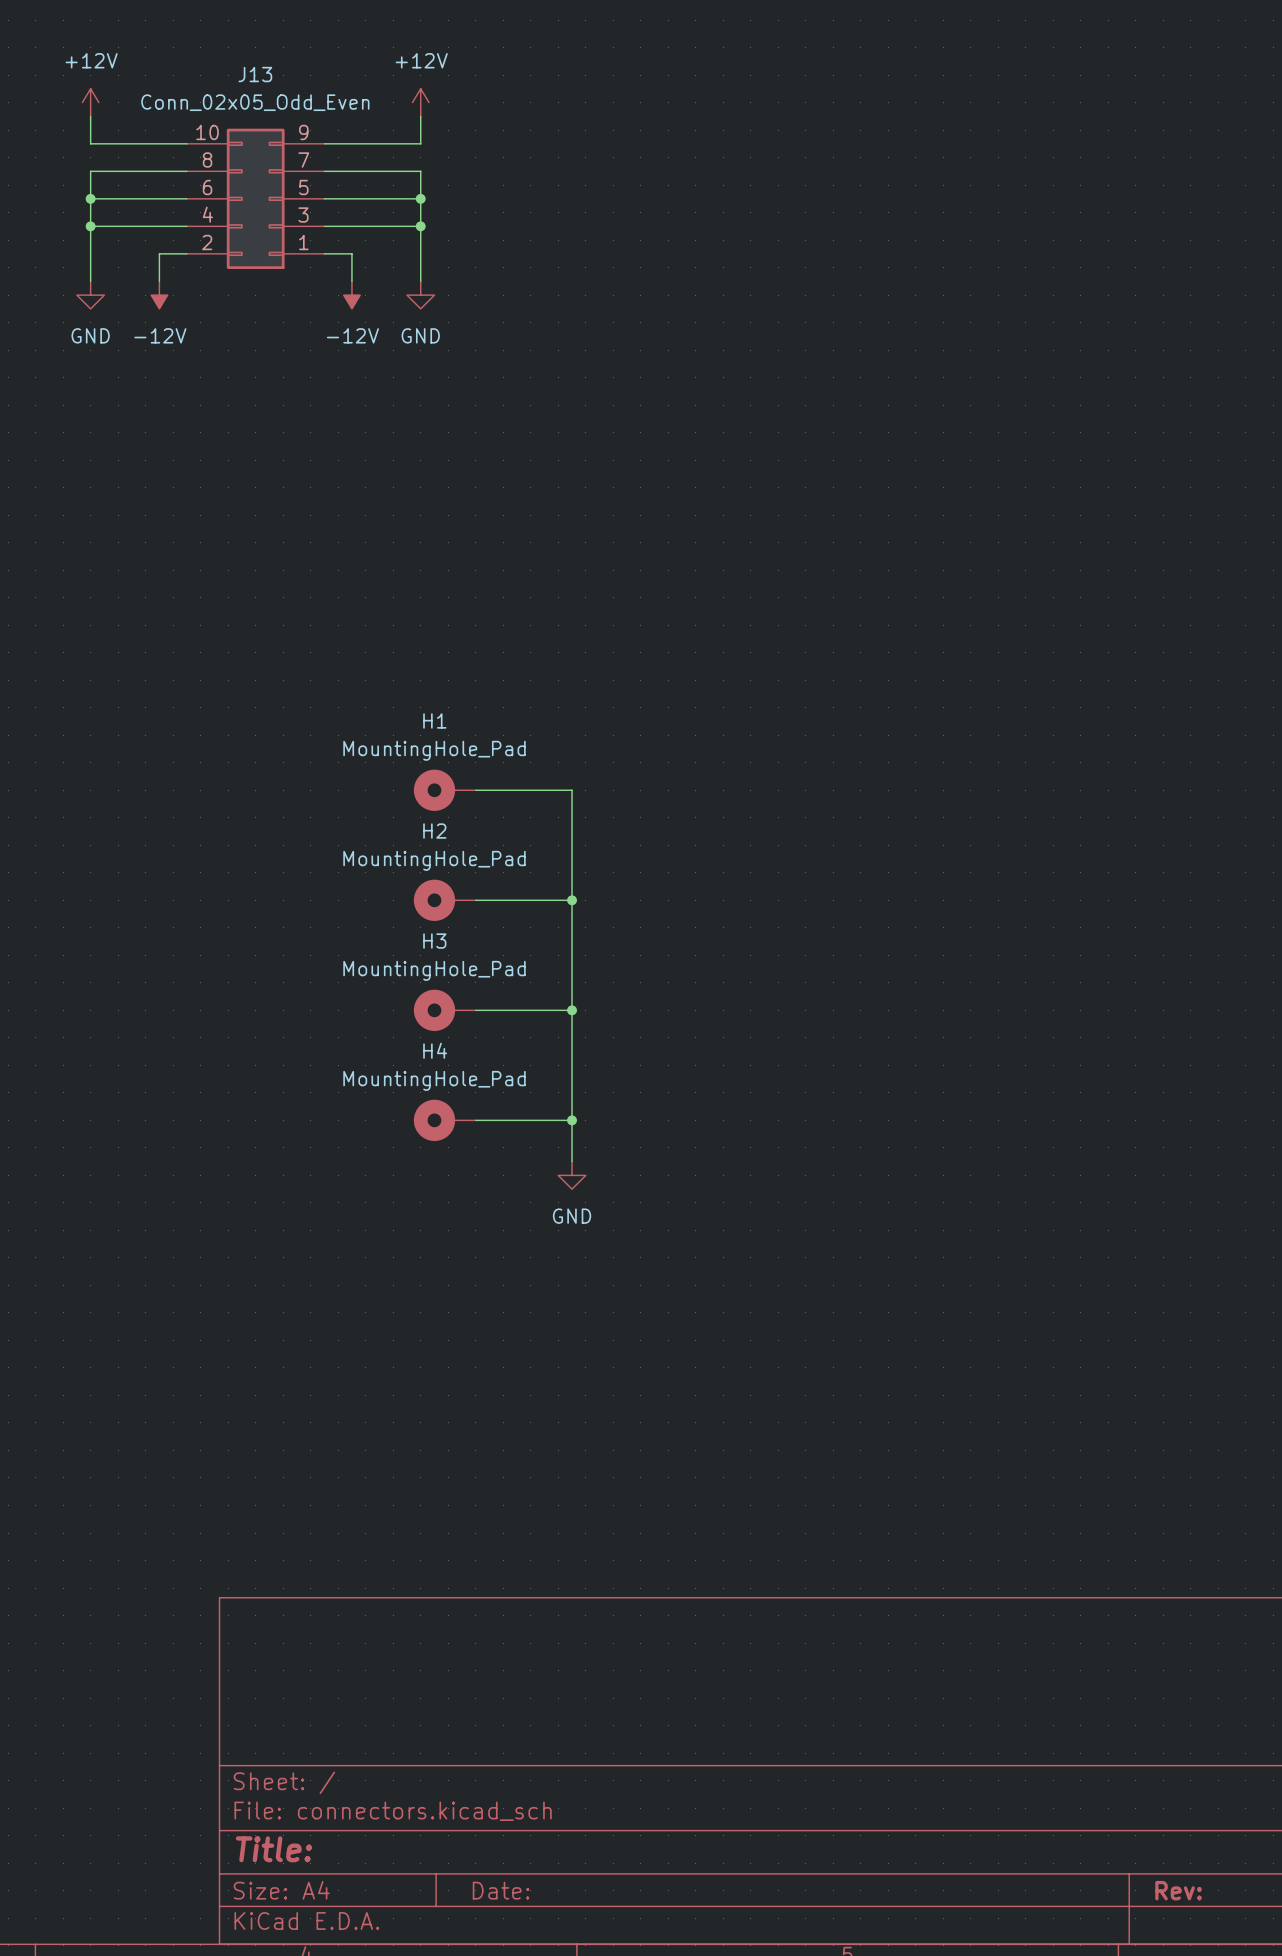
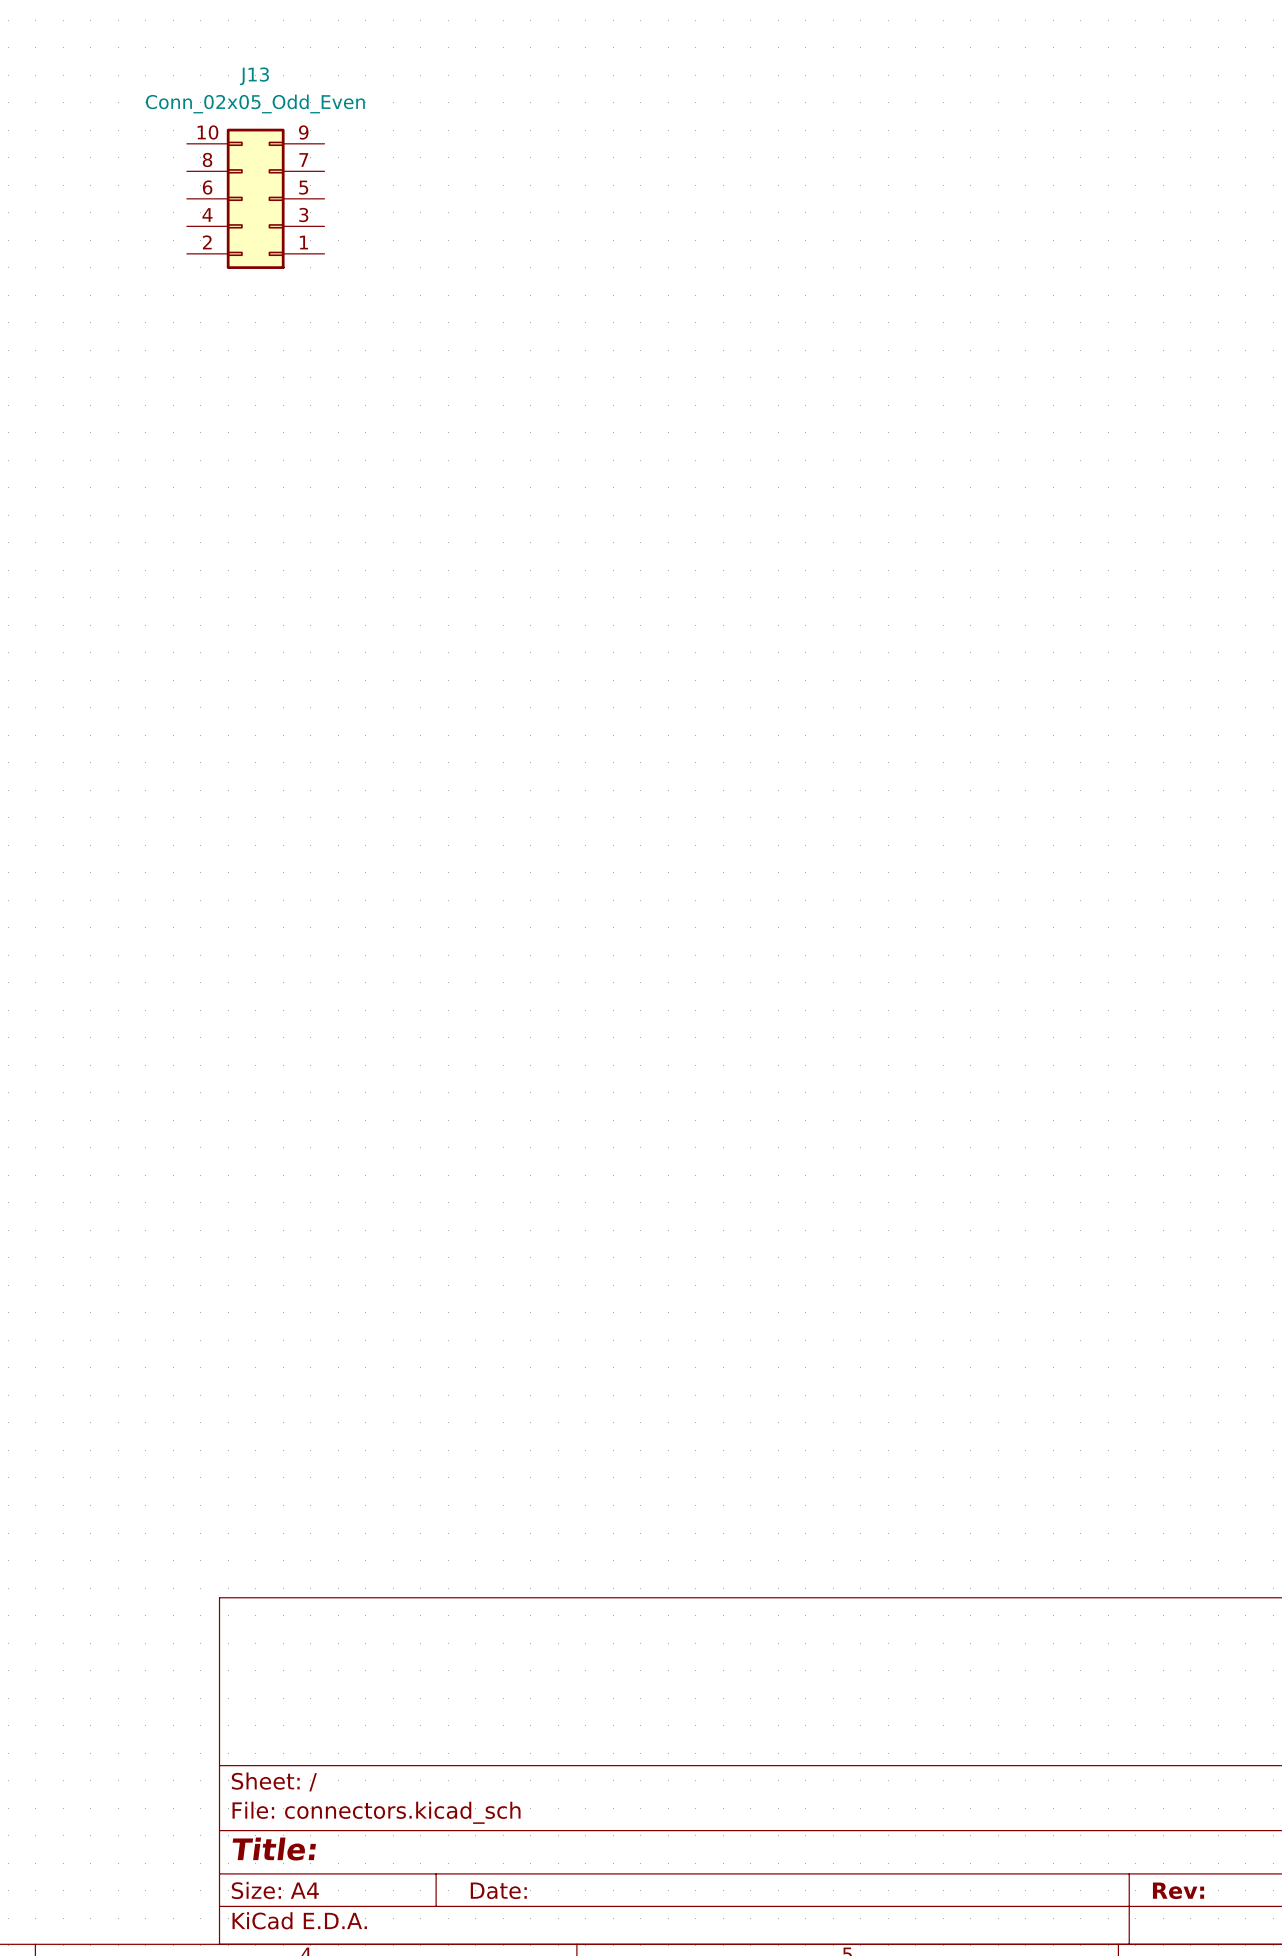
power symbol: +12V (90, 102) -> none
power symbol: +12V (420, 102) -> none
wire: (90, 116) (90, 143) (186, 143) -> none
wire: (420, 116) (420, 143) (324, 143) -> none
wire: (186, 171) (90, 171) (90, 281) -> none
wire: (324, 171) (420, 171) (420, 281) -> none
wire: (90, 198) (186, 198) -> none
junction: (90, 198) -> none
wire: (324, 198) (420, 198) -> none
junction: (420, 198) -> none
wire: (90, 226) (186, 226) -> none
junction: (90, 226) -> none
wire: (324, 226) (420, 226) -> none
junction: (420, 226) -> none
wire: (186, 253) (159, 253) (159, 281) -> none
wire: (324, 253) (351, 253) (351, 281) -> none
power symbol: GND (90, 295) -> none
power symbol: -12V (159, 295) -> none
power symbol: -12V (351, 295) -> none
power symbol: GND (420, 295) -> none
H1: MountingHole_Pad (444, 790) -> none
wire: (475, 790) (572, 790) (572, 1161) -> none
H2: MountingHole_Pad (444, 900) -> none
wire: (475, 900) (572, 900) -> none
junction: (572, 900) -> none
H3: MountingHole_Pad (444, 1010) -> none
wire: (475, 1010) (572, 1010) -> none
junction: (572, 1010) -> none
H4: MountingHole_Pad (444, 1120) -> none
wire: (475, 1120) (572, 1120) -> none
junction: (572, 1120) -> none
power symbol: GND (572, 1175) -> none

